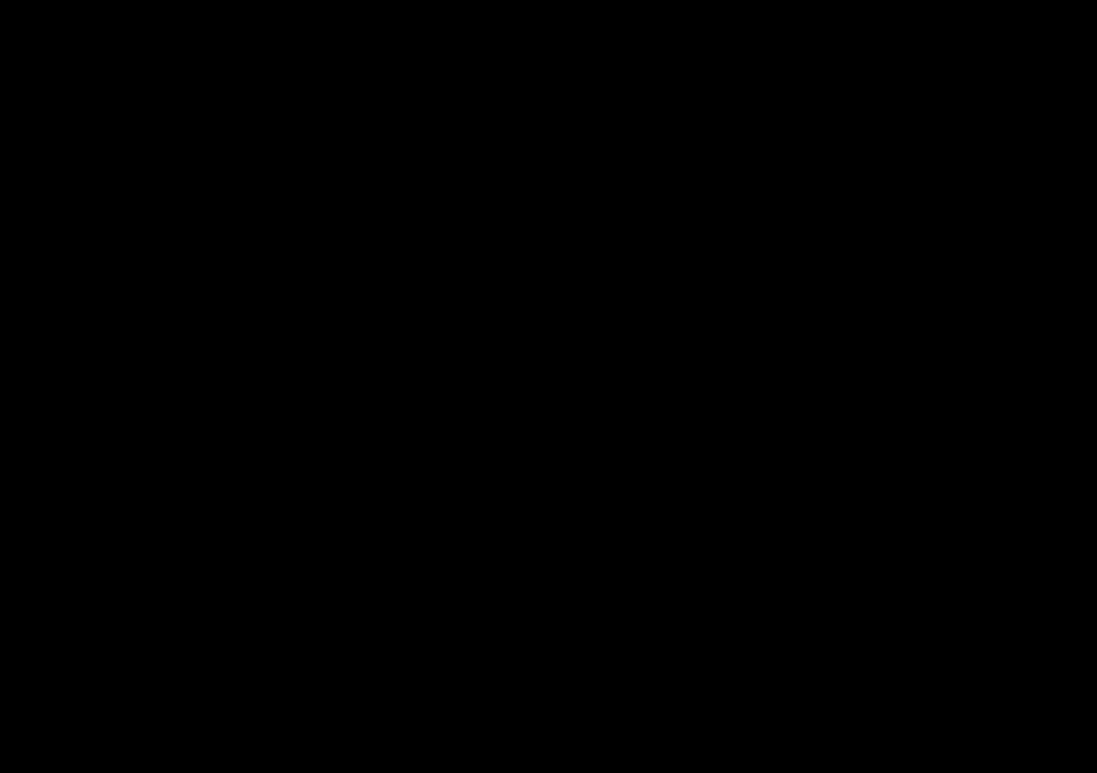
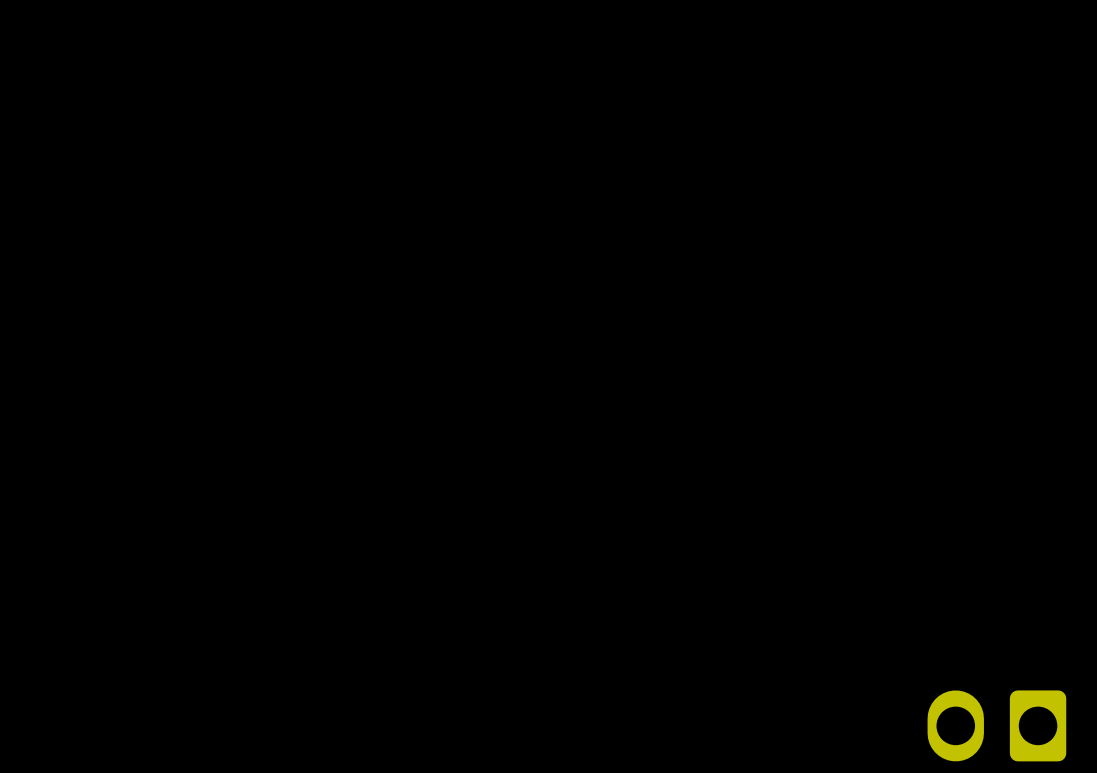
part: none -> (996, 725)

